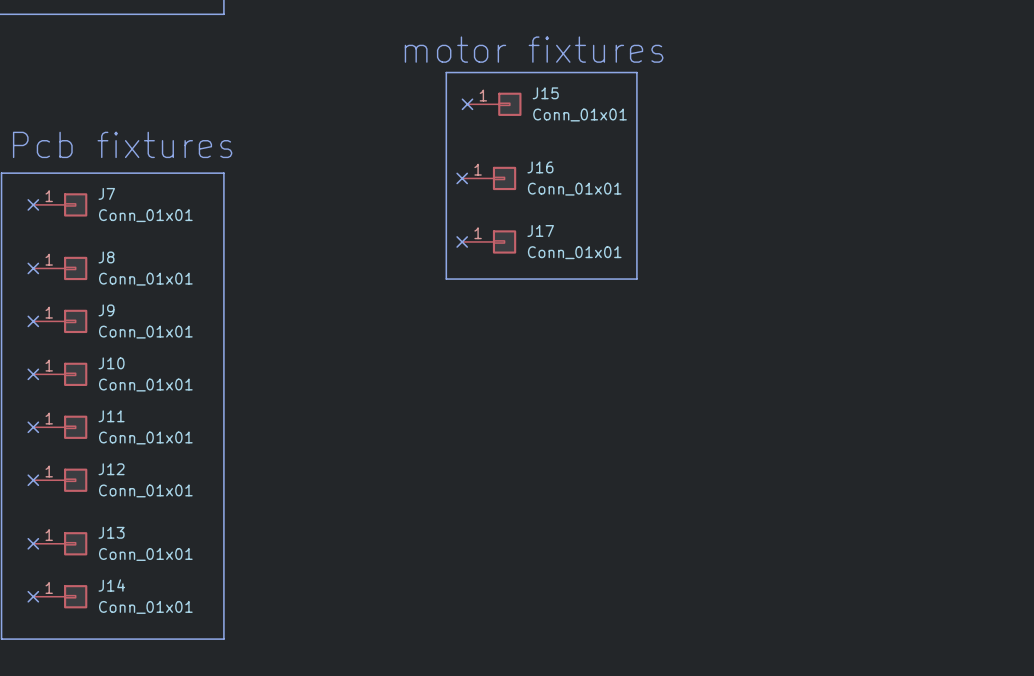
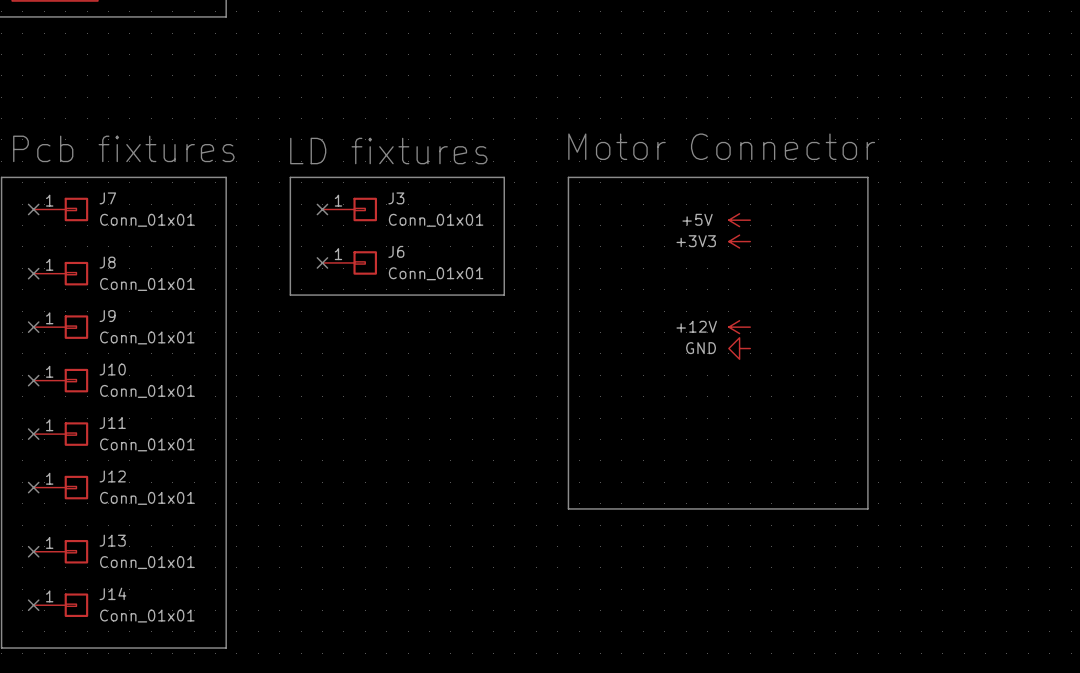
text: motor fixtures (534, 49) -> none
line: (446, 72) (446, 279) (636, 279) (636, 72) (446, 72) -> none
no-connect mark: (467, 104) -> none
J15: Conn_01x01 (494, 104) -> none
text: none -> Motor Connector (721, 146)
text: none -> LD fixtures (388, 151)
line: none -> (290, 177) (290, 295) (504, 295) (504, 177) (290, 177)
line: none -> (568, 177) (867, 177) (867, 508) (568, 508) (568, 177)
no-connect mark: (462, 178) -> none
J16: Conn_01x01 (489, 178) -> none
no-connect mark: none -> (322, 209)
J3: none -> Conn_01x01 (349, 209)
power symbol: none -> +5V (739, 220)
power symbol: none -> +3V3 (739, 241)
no-connect mark: (462, 241) -> none
J17: Conn_01x01 (489, 241) -> none
no-connect mark: none -> (322, 262)
J6: none -> Conn_01x01 (349, 262)
power symbol: none -> +12V (739, 327)
power symbol: none -> GND (739, 348)

